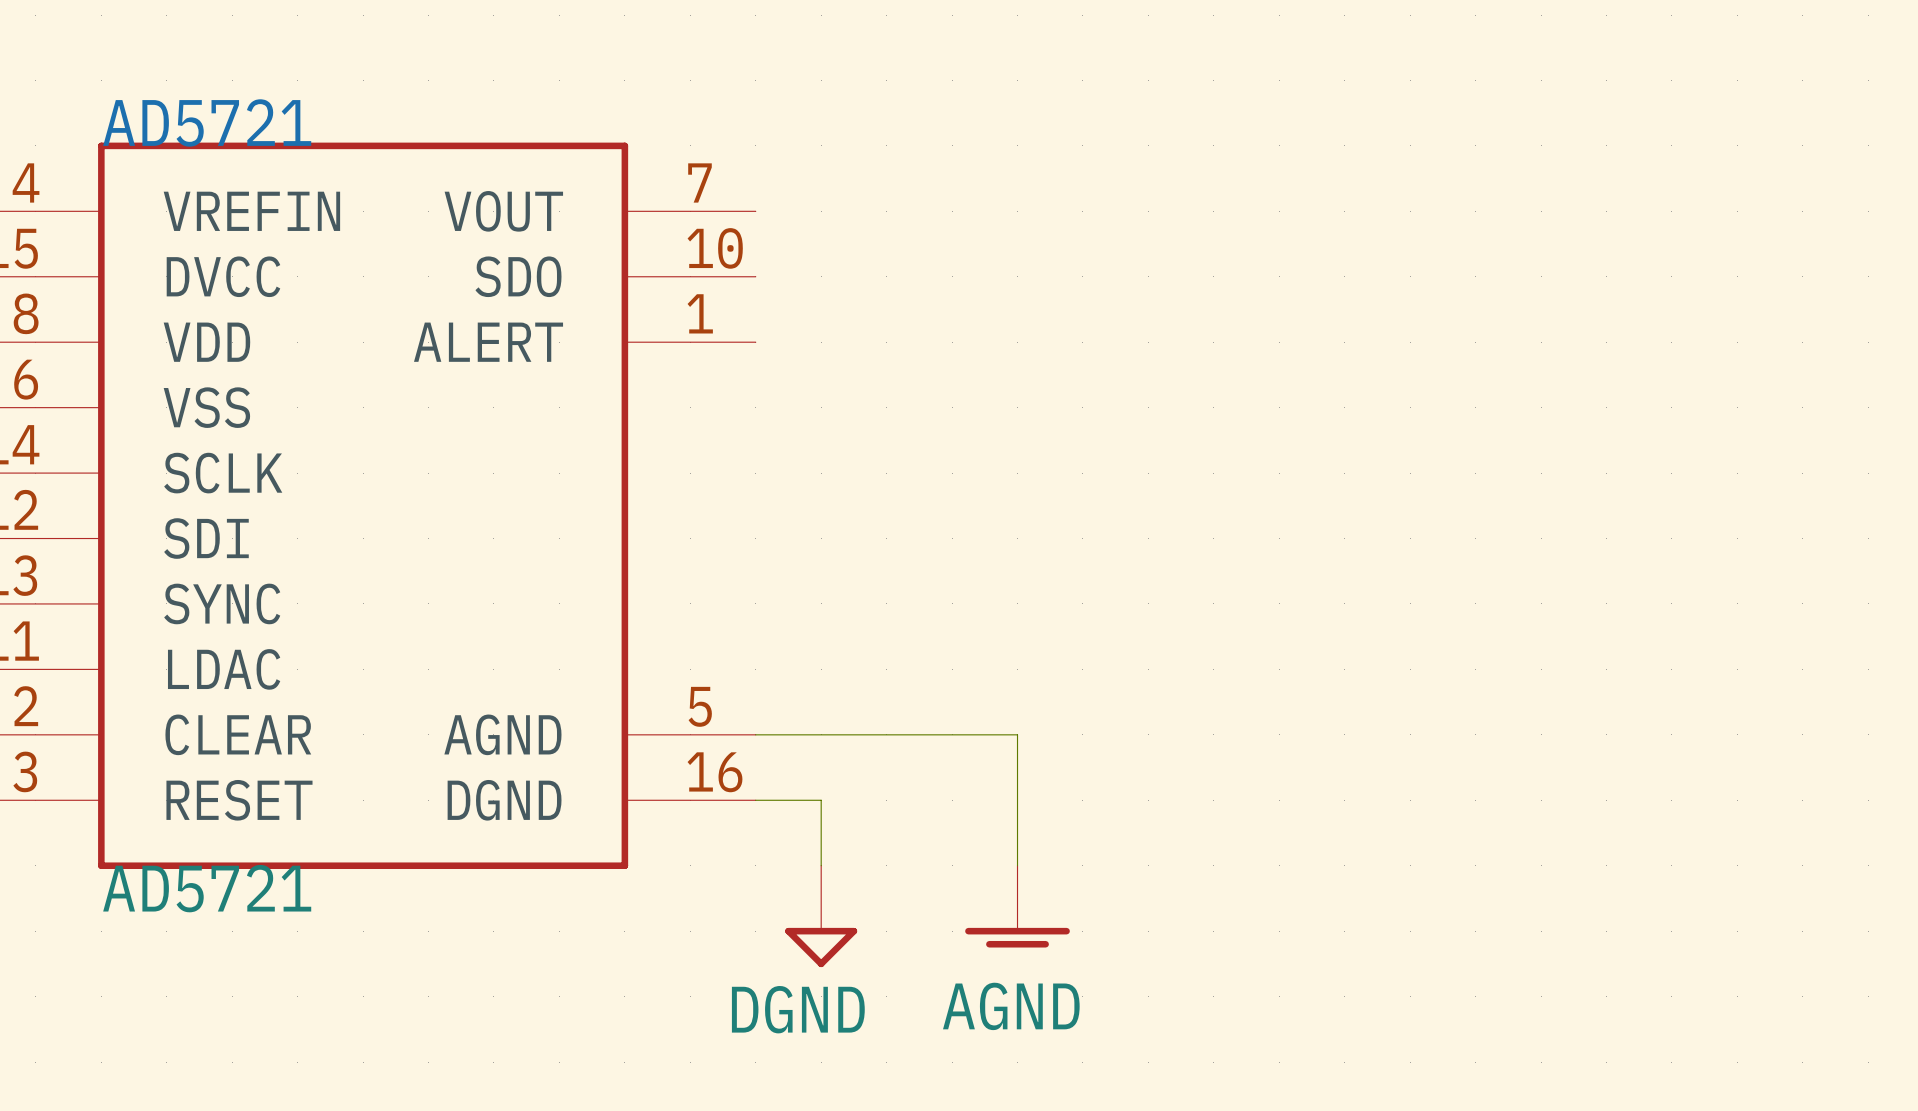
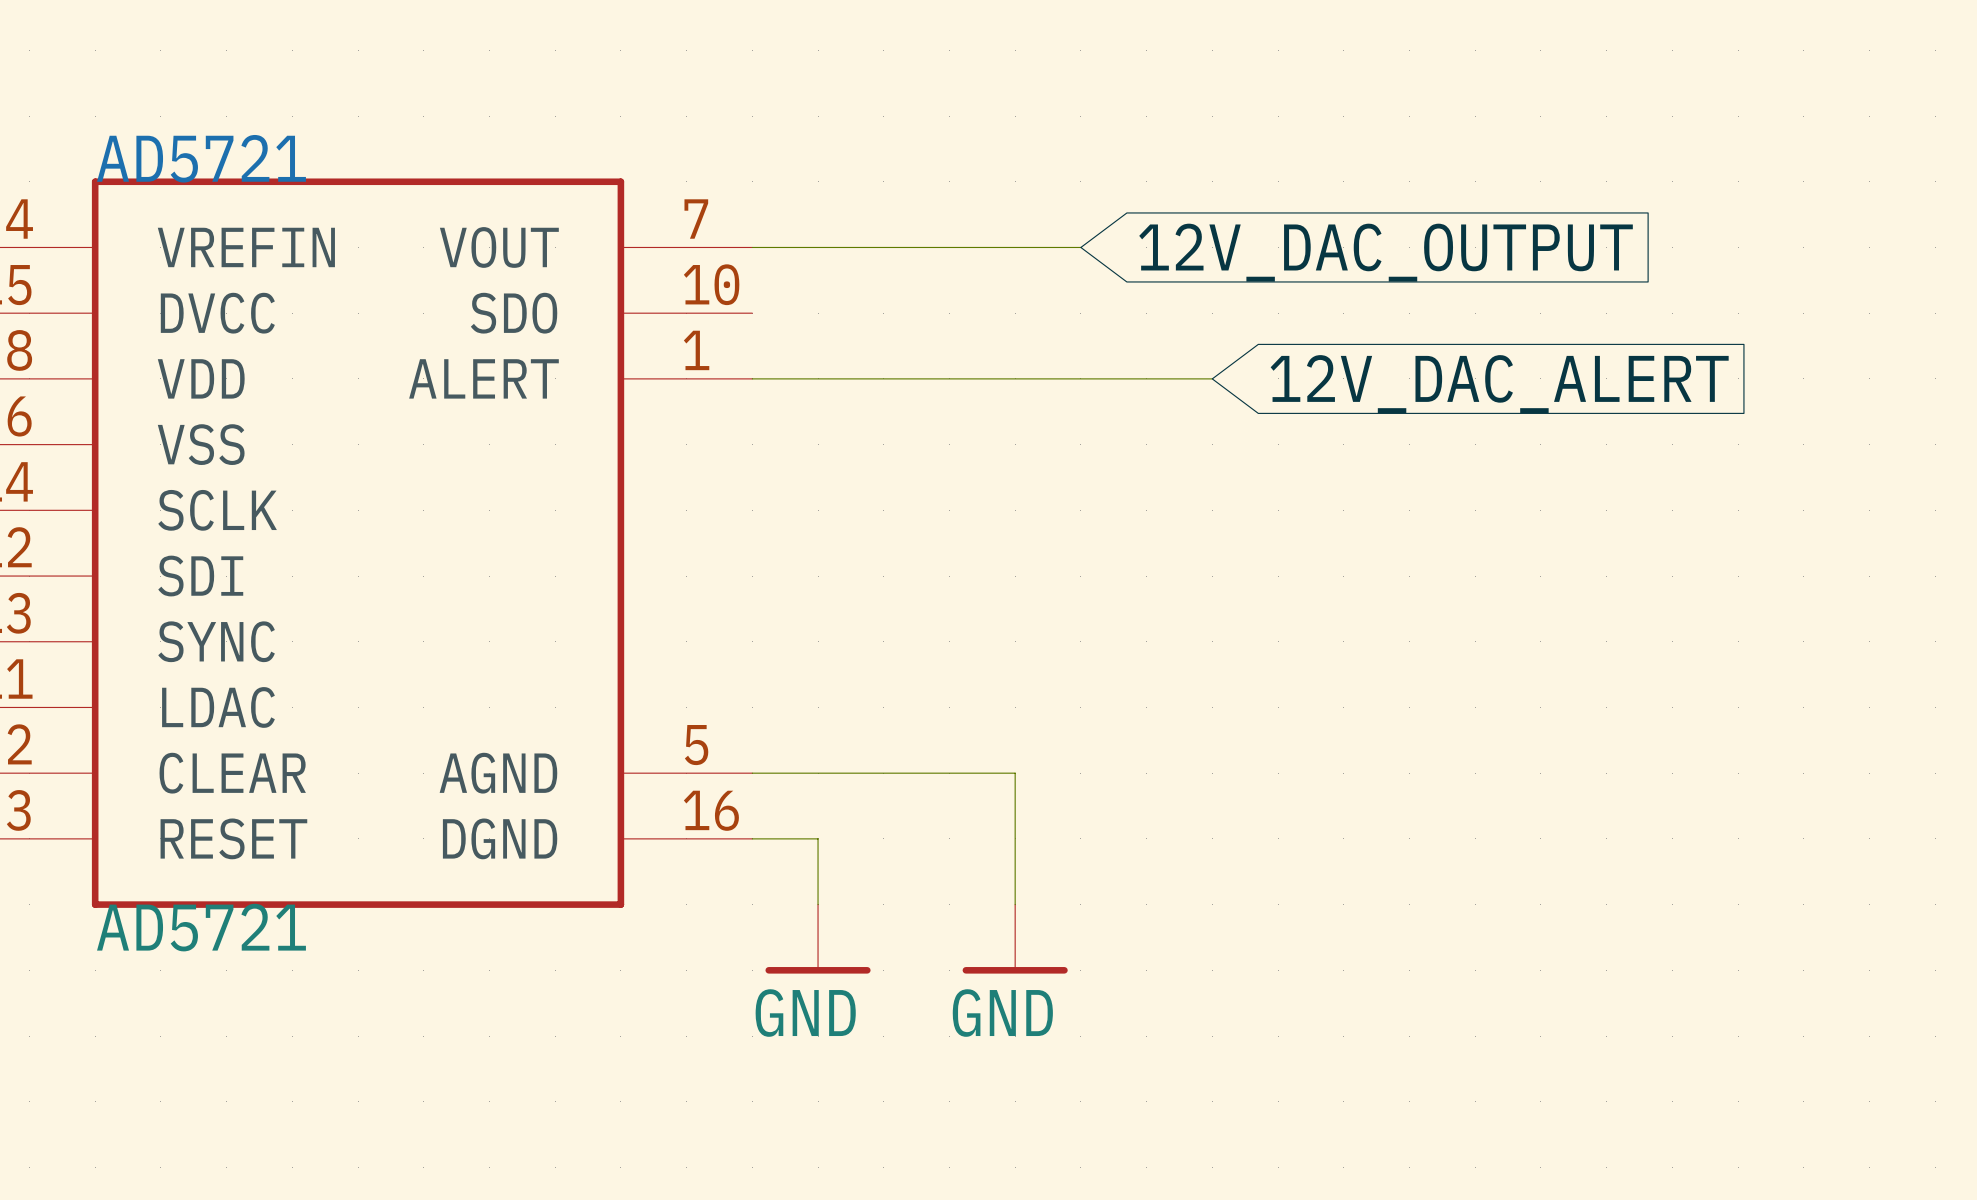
wire: none -> (752, 247) (1080, 247)
global label: none -> 12V_DAC_OUTPUT (1386, 252)
wire: none -> (752, 378) (1212, 378)
global label: none -> 12V_DAC_ALERT (1499, 384)
power symbol: AGND (1017, 906) -> GND (1015, 939)
power symbol: DGND (821, 916) -> GND (818, 939)

